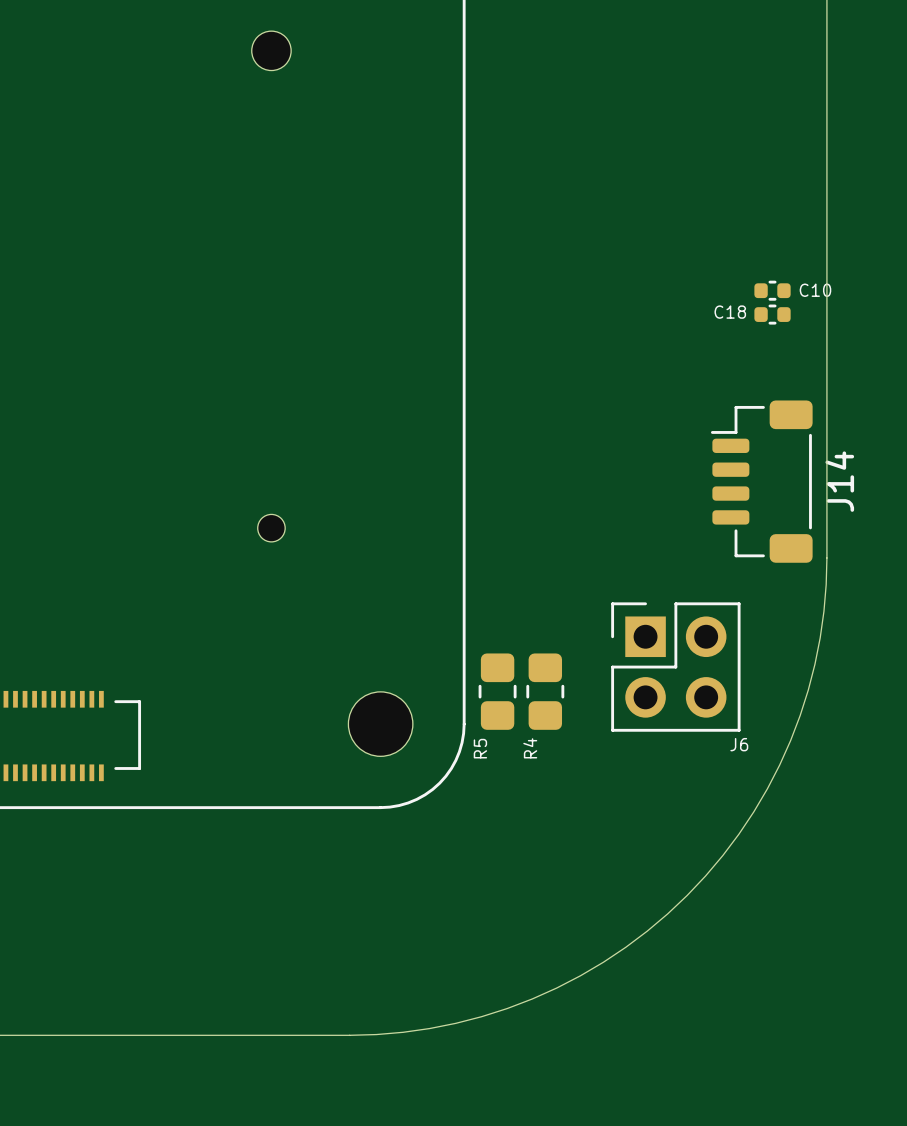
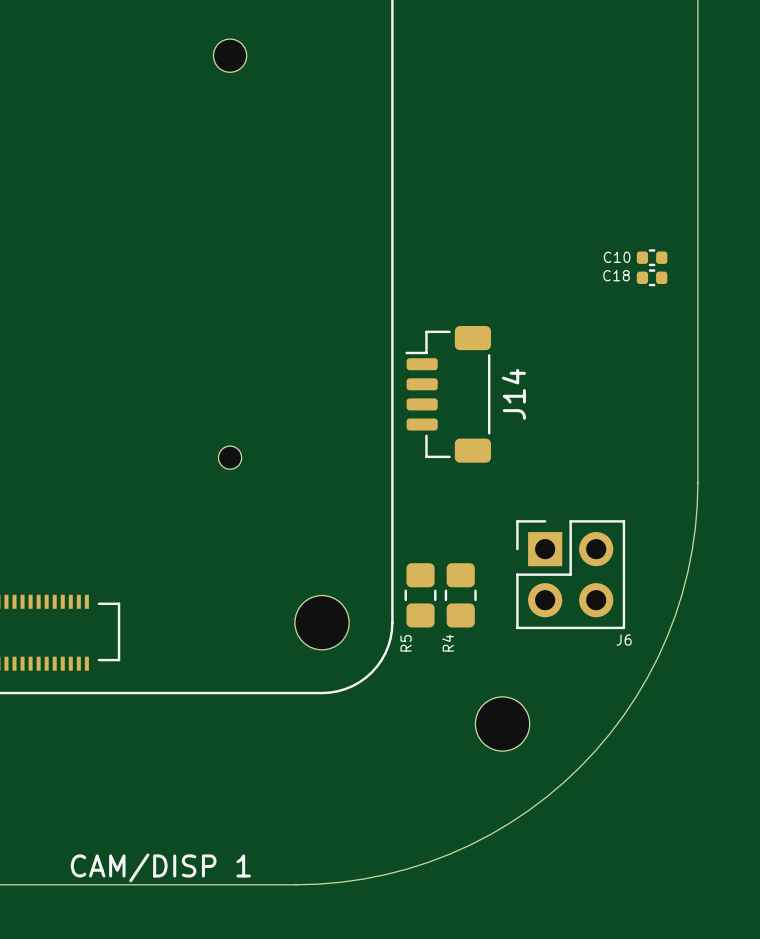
C10 name position: C10 (815, 290) -> C10 (617, 257)
J14 position: (761, 481) -> (448, 394)
part: none -> (502, 723)
text: none -> CAM/DISP 1 (160, 867)

